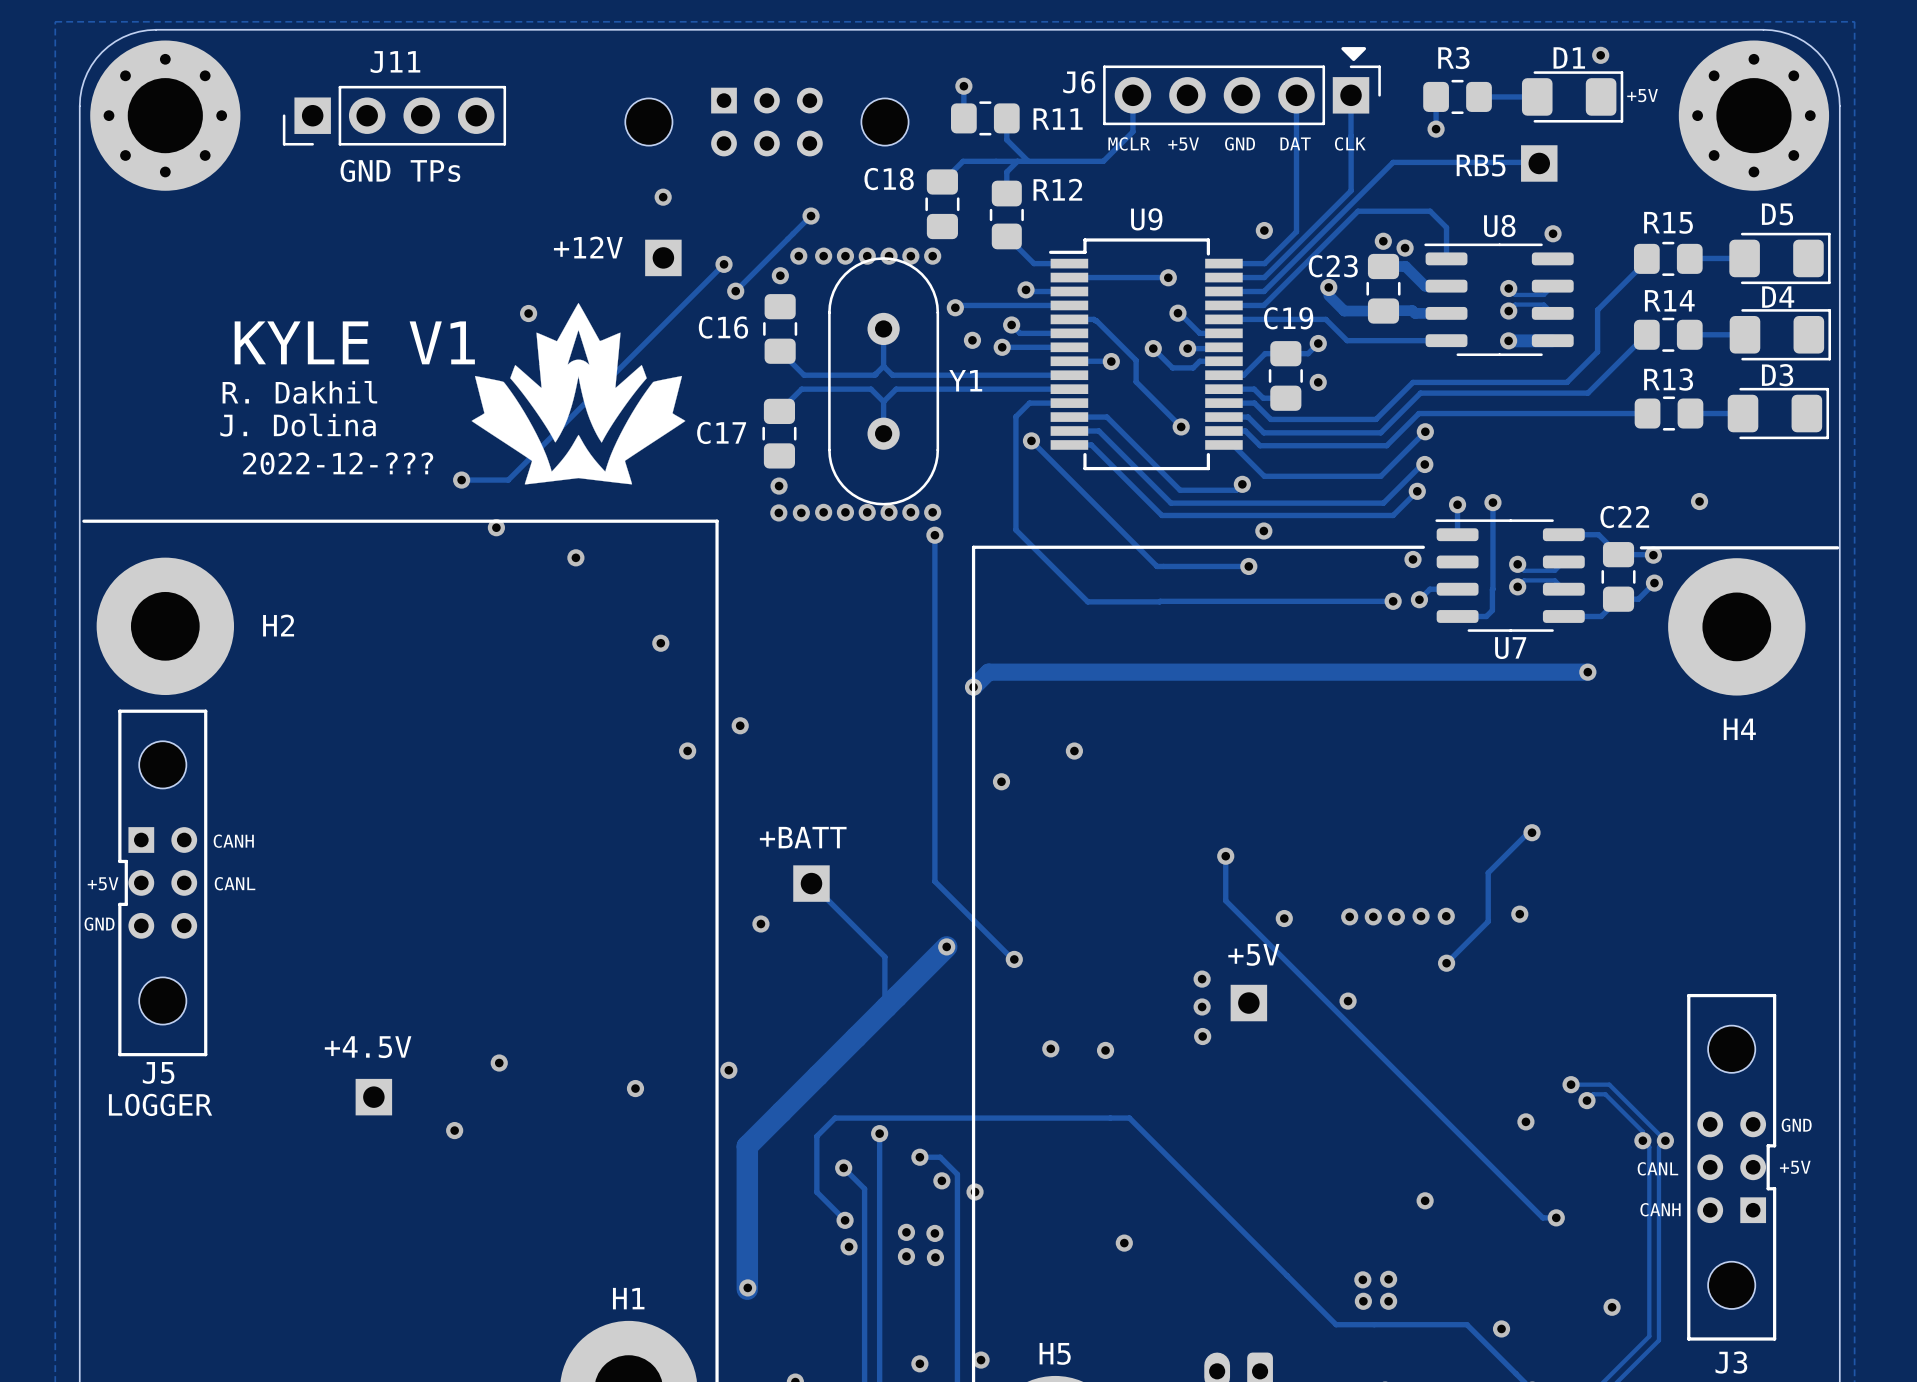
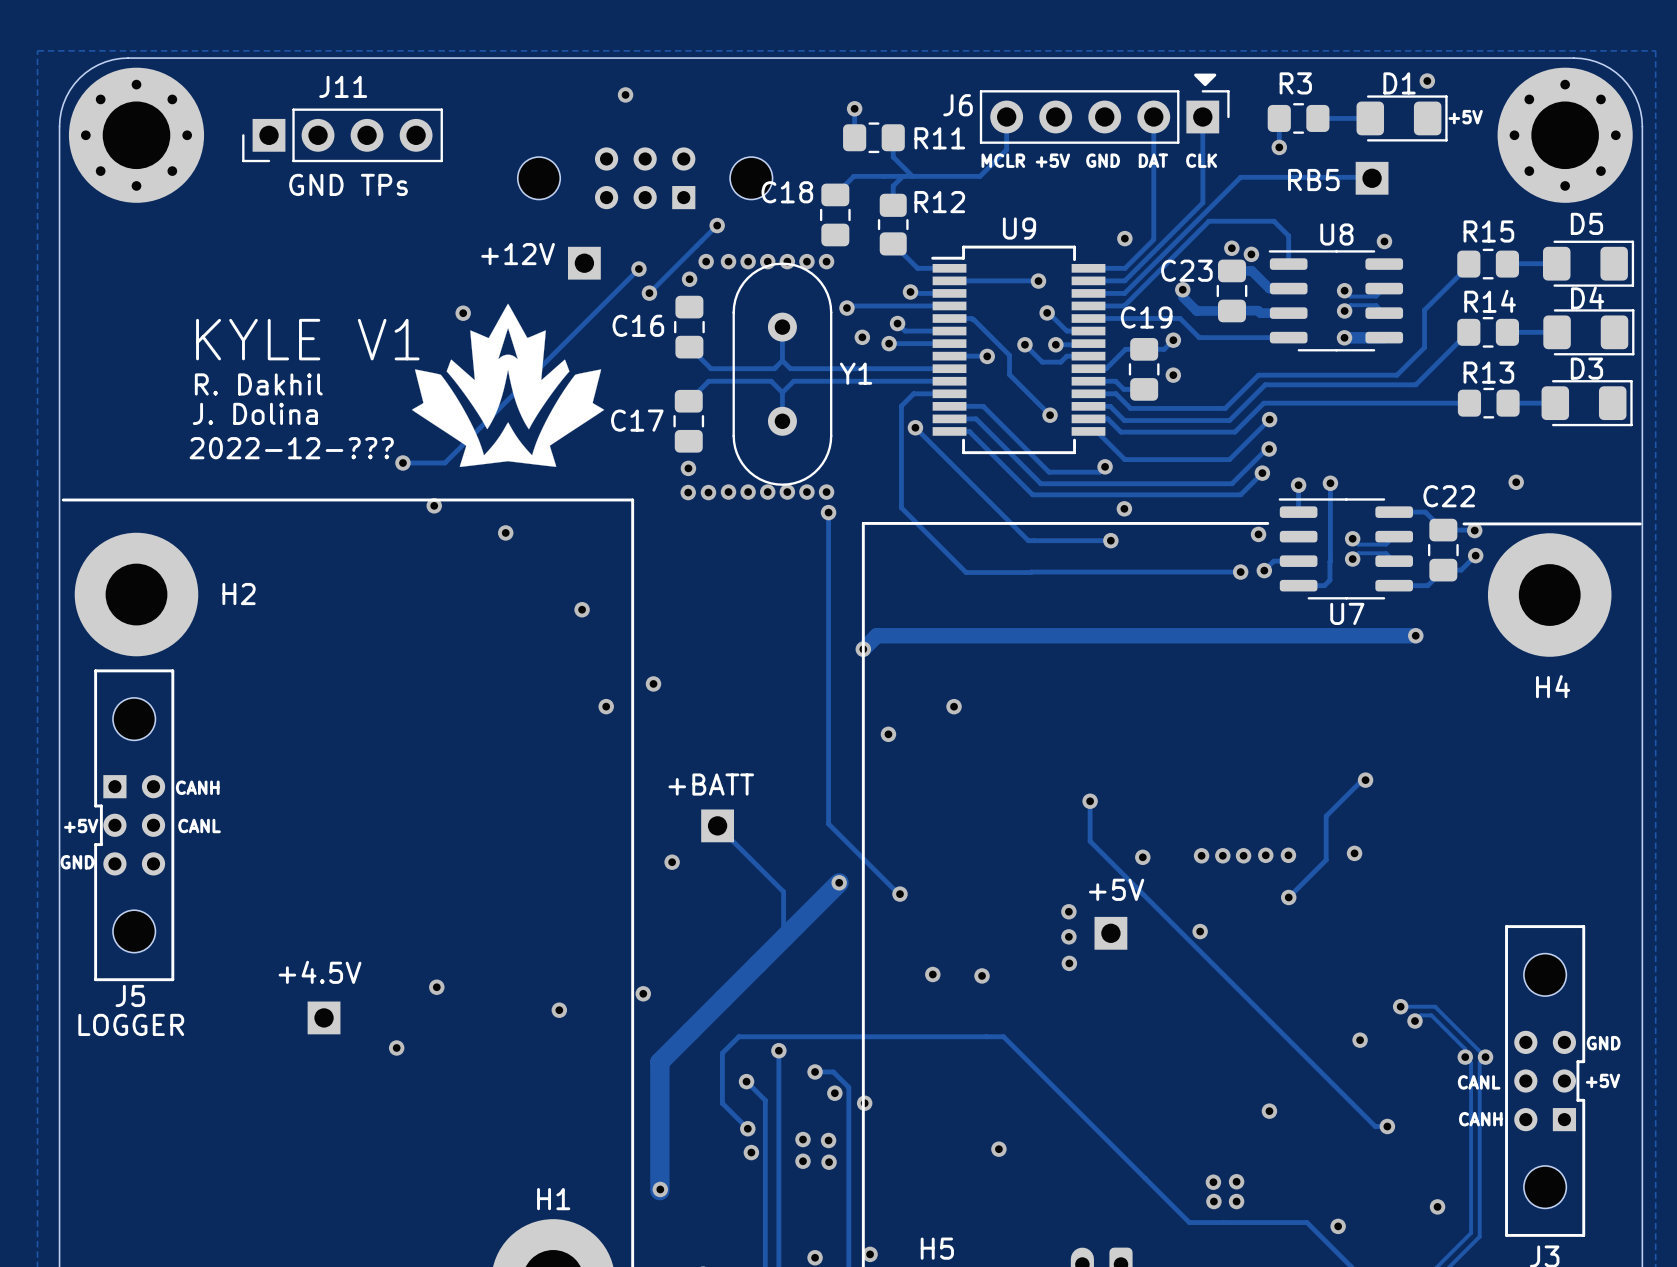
via: none -> (625, 94)
part rotation: 0° (766, 122) -> 180° (645, 178)
via: (663, 197) -> none

